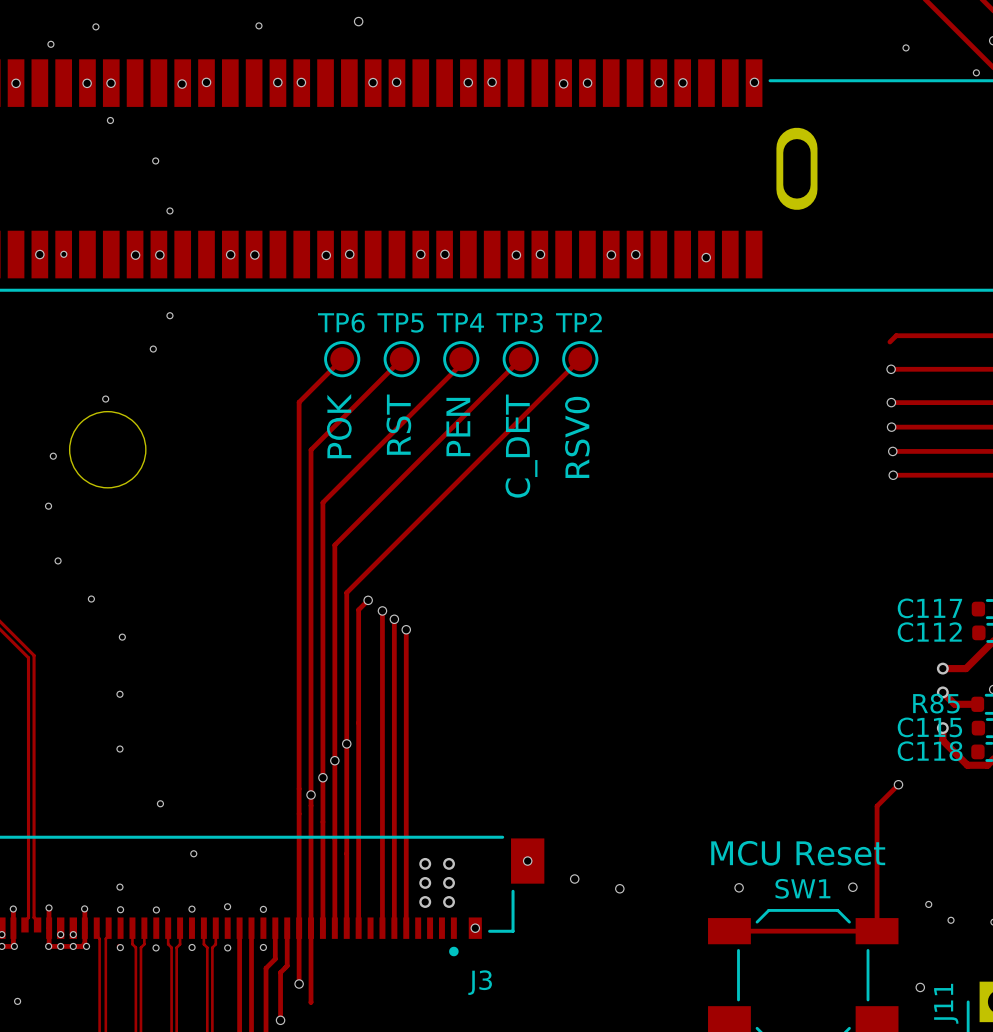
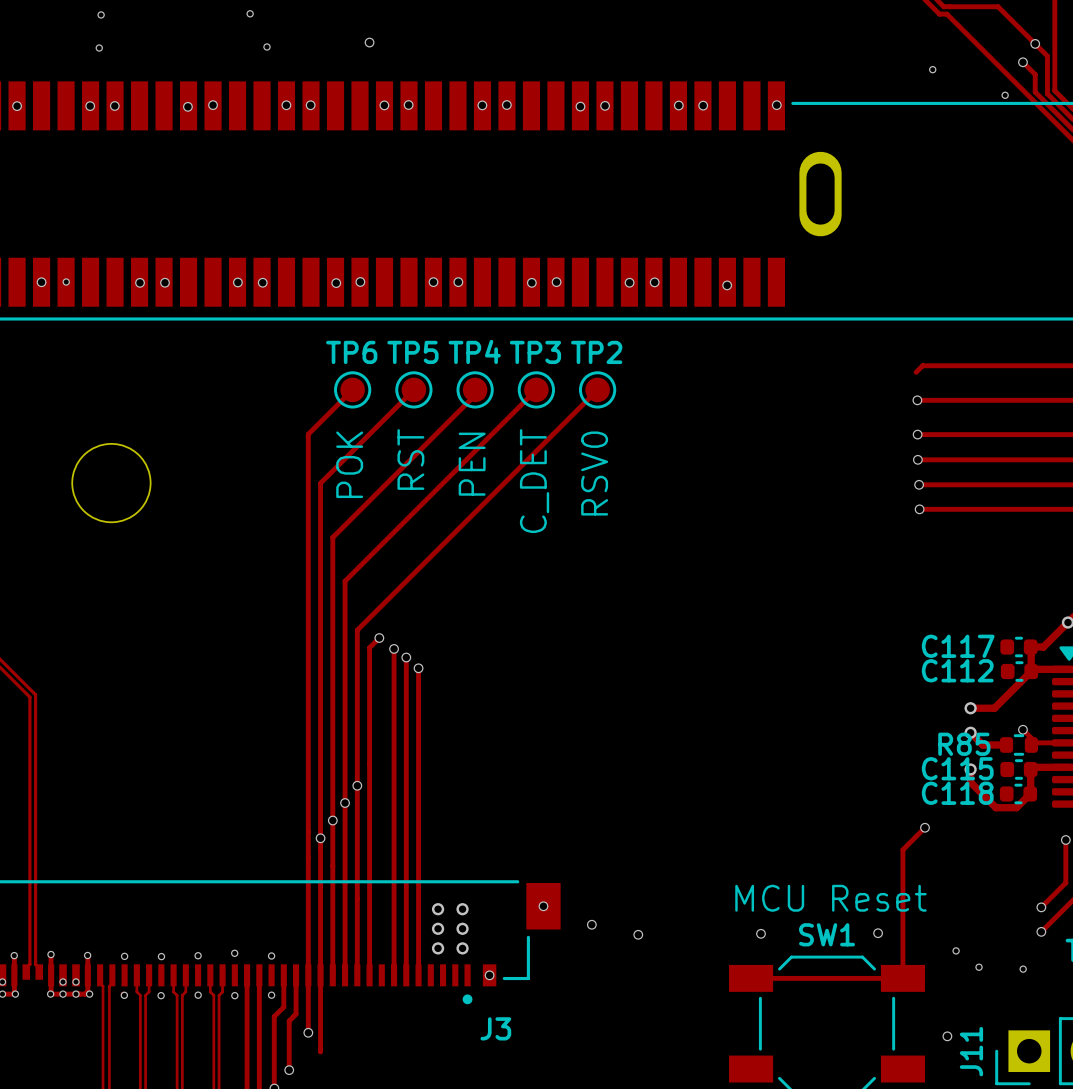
via: (50, 44) -> none
via: (110, 120) -> none
via: (155, 160) -> none
via: (169, 210) -> none
via: (169, 315) -> none
via: (153, 349) -> none
via: (105, 399) -> none
via: (53, 456) -> none
via: (48, 506) -> none
via: (58, 560) -> none
via: (91, 599) -> none
via: (122, 637) -> none
via: (119, 694) -> none
via: (119, 749) -> none
via: (160, 803) -> none
via: (193, 853) -> none
via: (119, 887) -> none
via: (17, 1001) -> none

